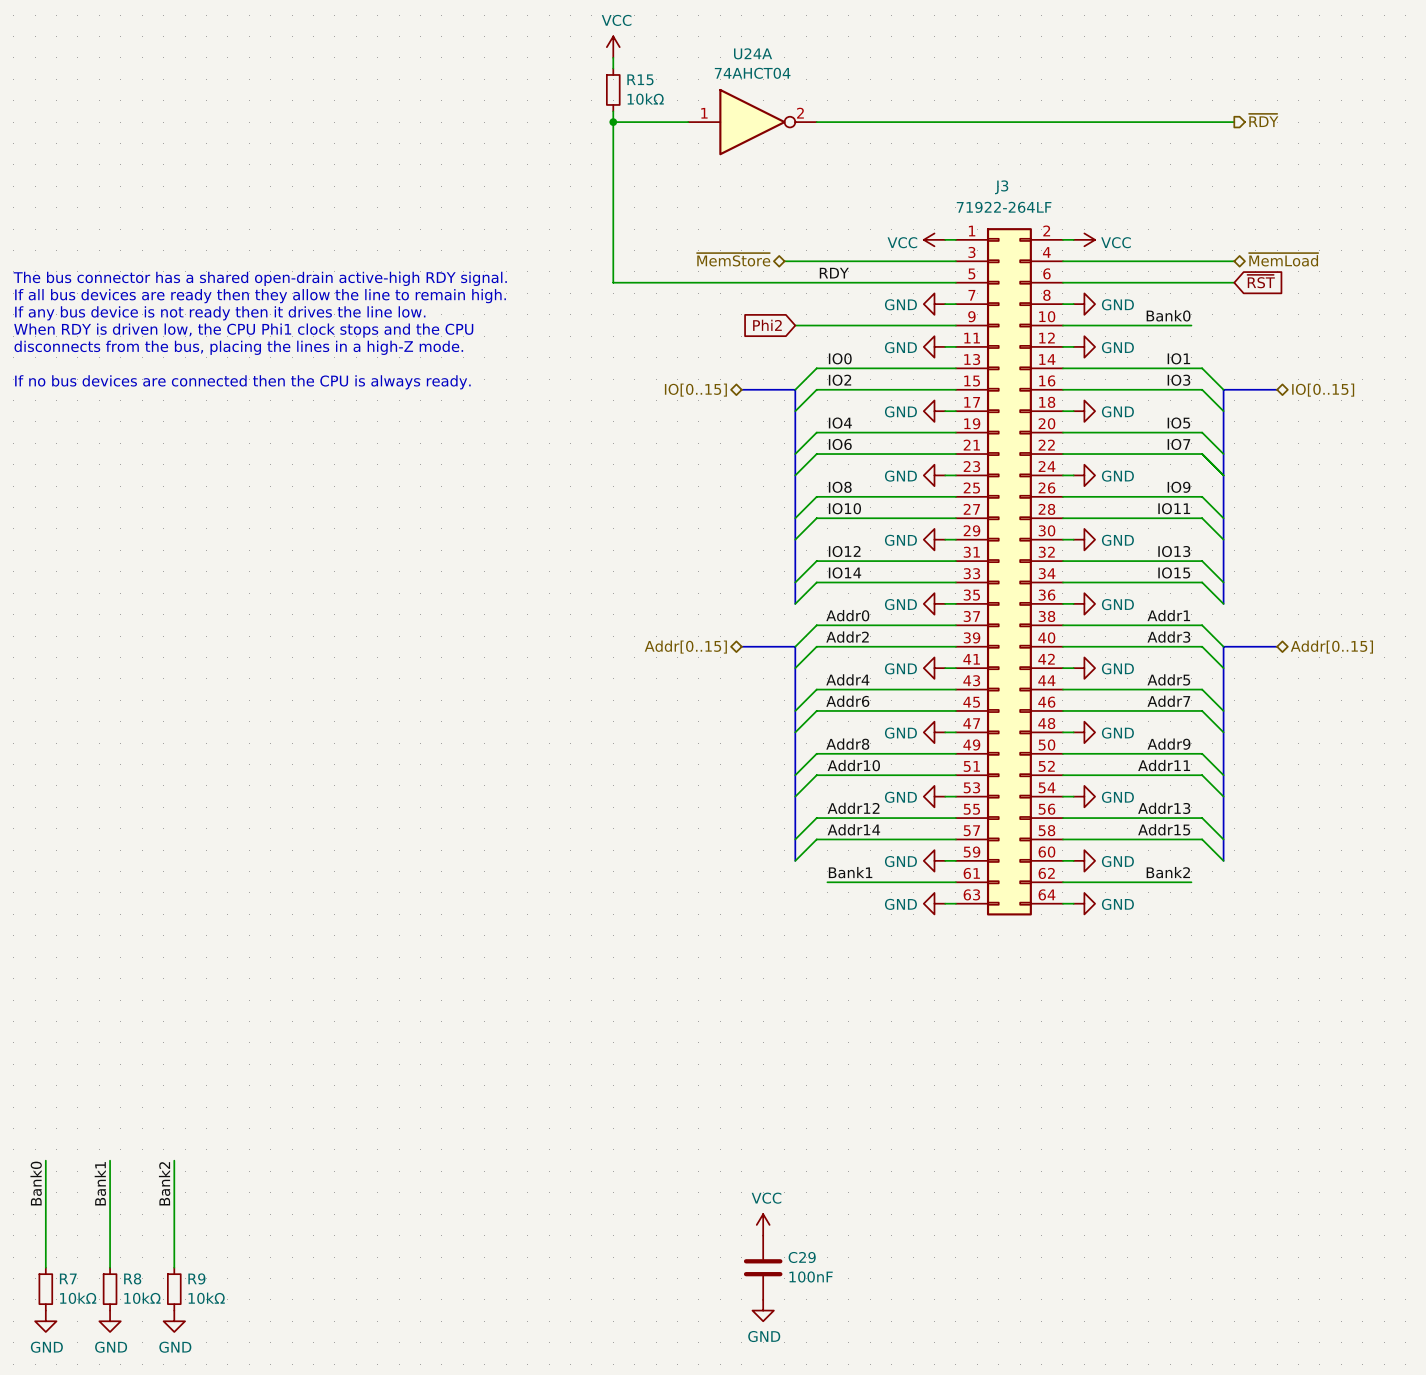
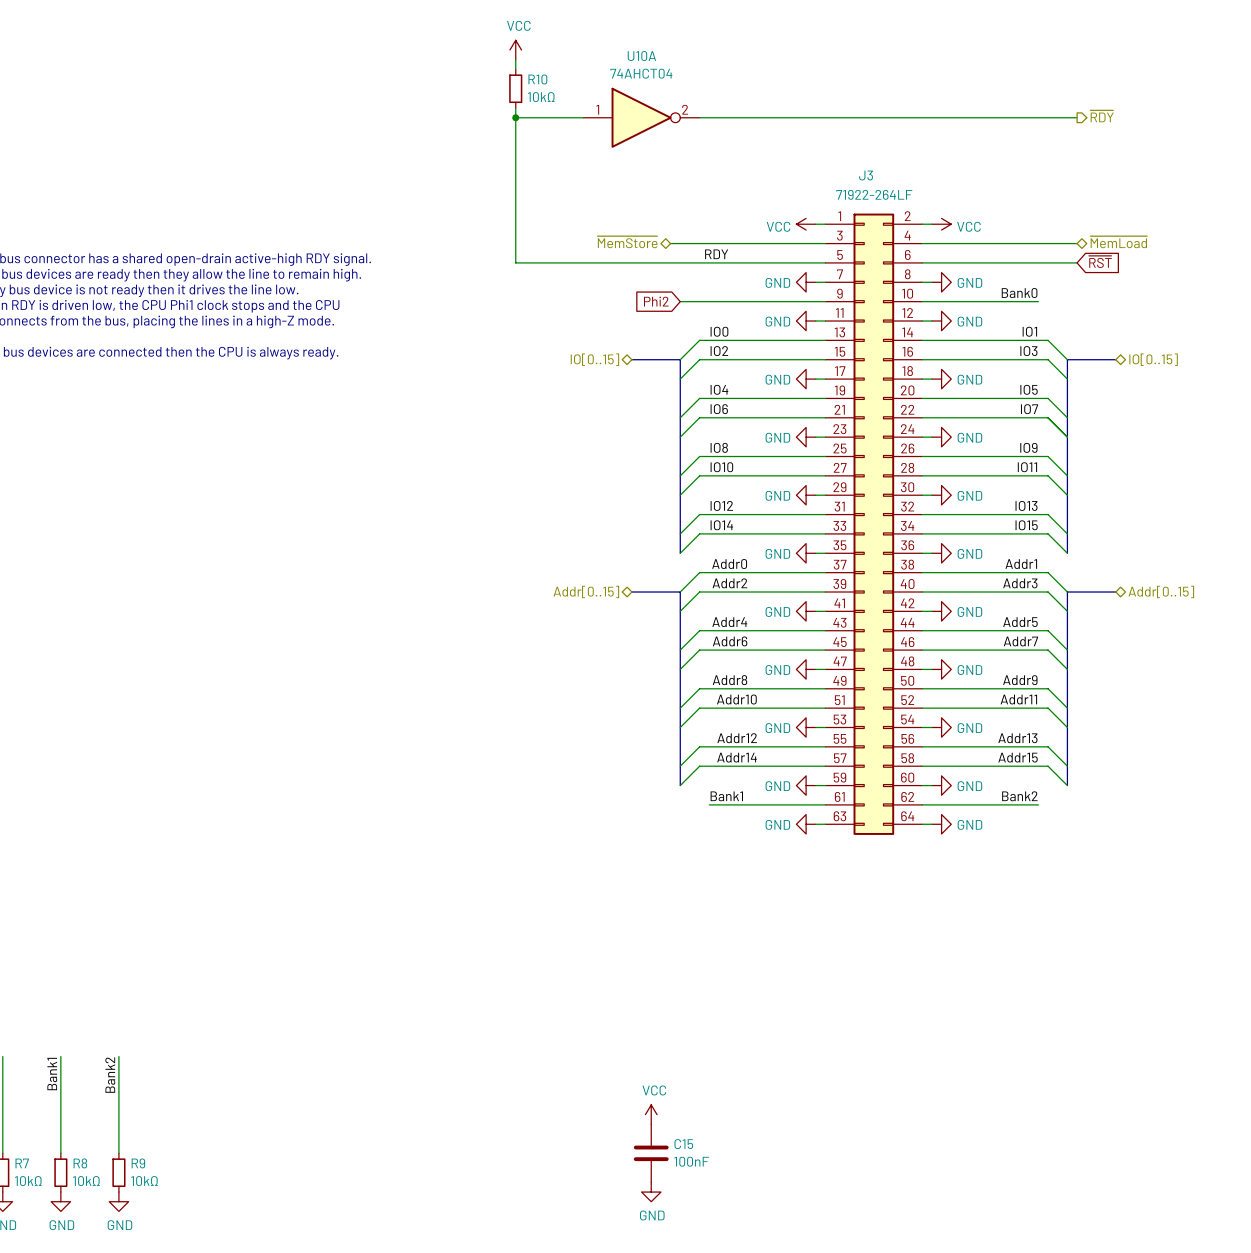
U24A name: U24A (753, 53) -> U10A (641, 56)
R15 name: R15 (640, 79) -> R10 (537, 79)
C29 name: C29 (802, 1257) -> C15 (683, 1144)

